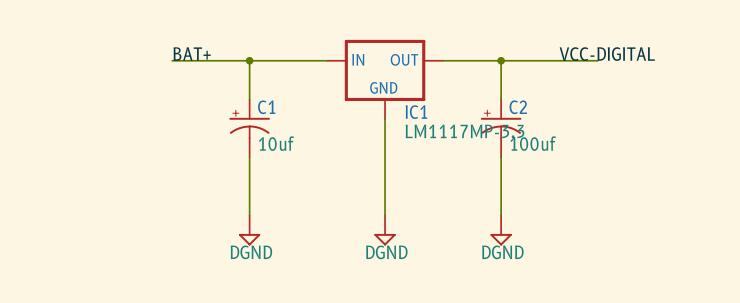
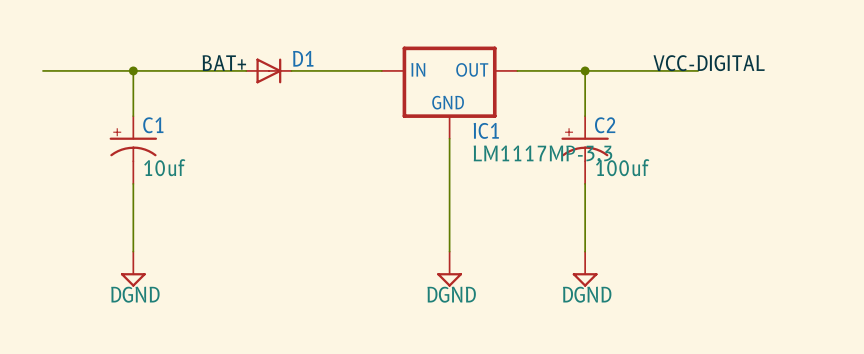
wire: none -> (42, 70) (201, 70)
wire: none -> (133, 70) (133, 116)
junction: none -> (133, 70)
wire: (210, 60) (249, 60) (249, 99) -> none
D1: none -> (268, 70)
junction: (249, 60) -> none
C1 position: (249, 128) -> (133, 150)
wire: (249, 157) (249, 215) -> (133, 183) (133, 251)
power symbol position: DGND (249, 230) -> DGND (133, 269)

